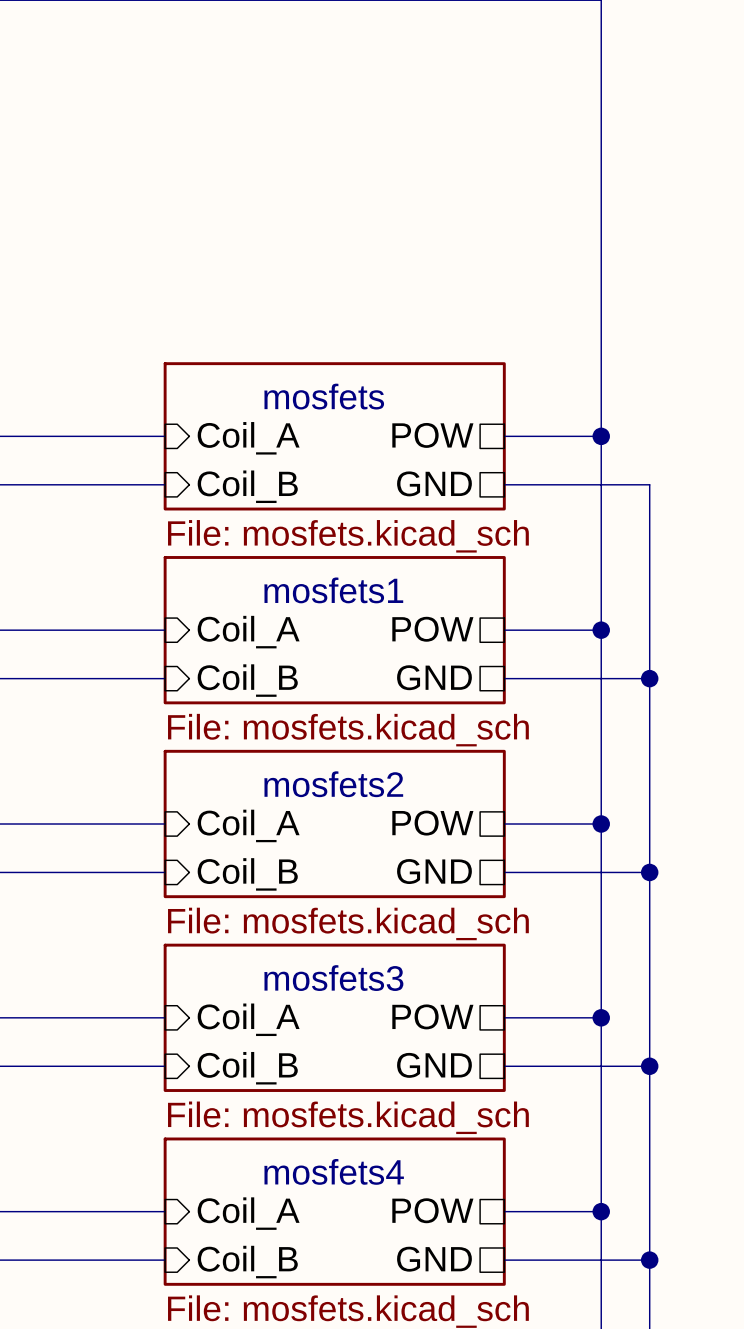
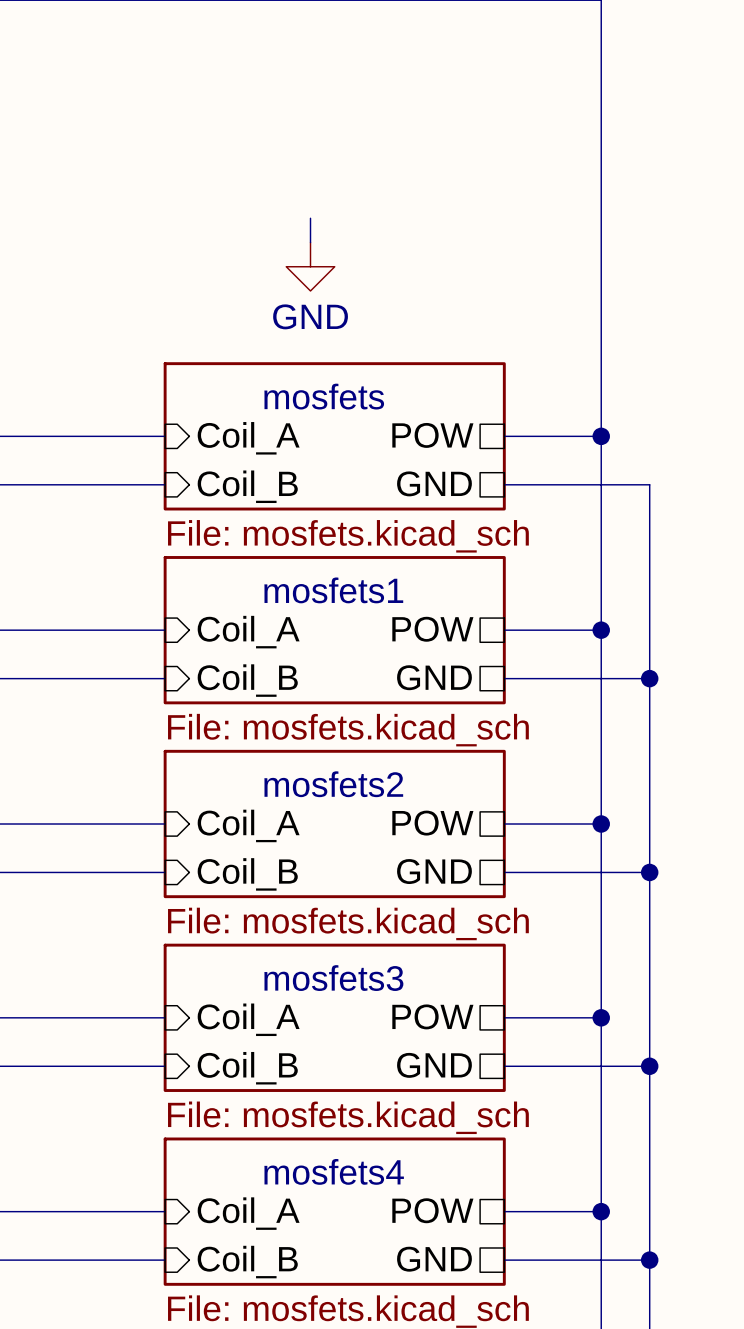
wire: none -> (310, 218) (310, 242)
power symbol: none -> GND (310, 266)

